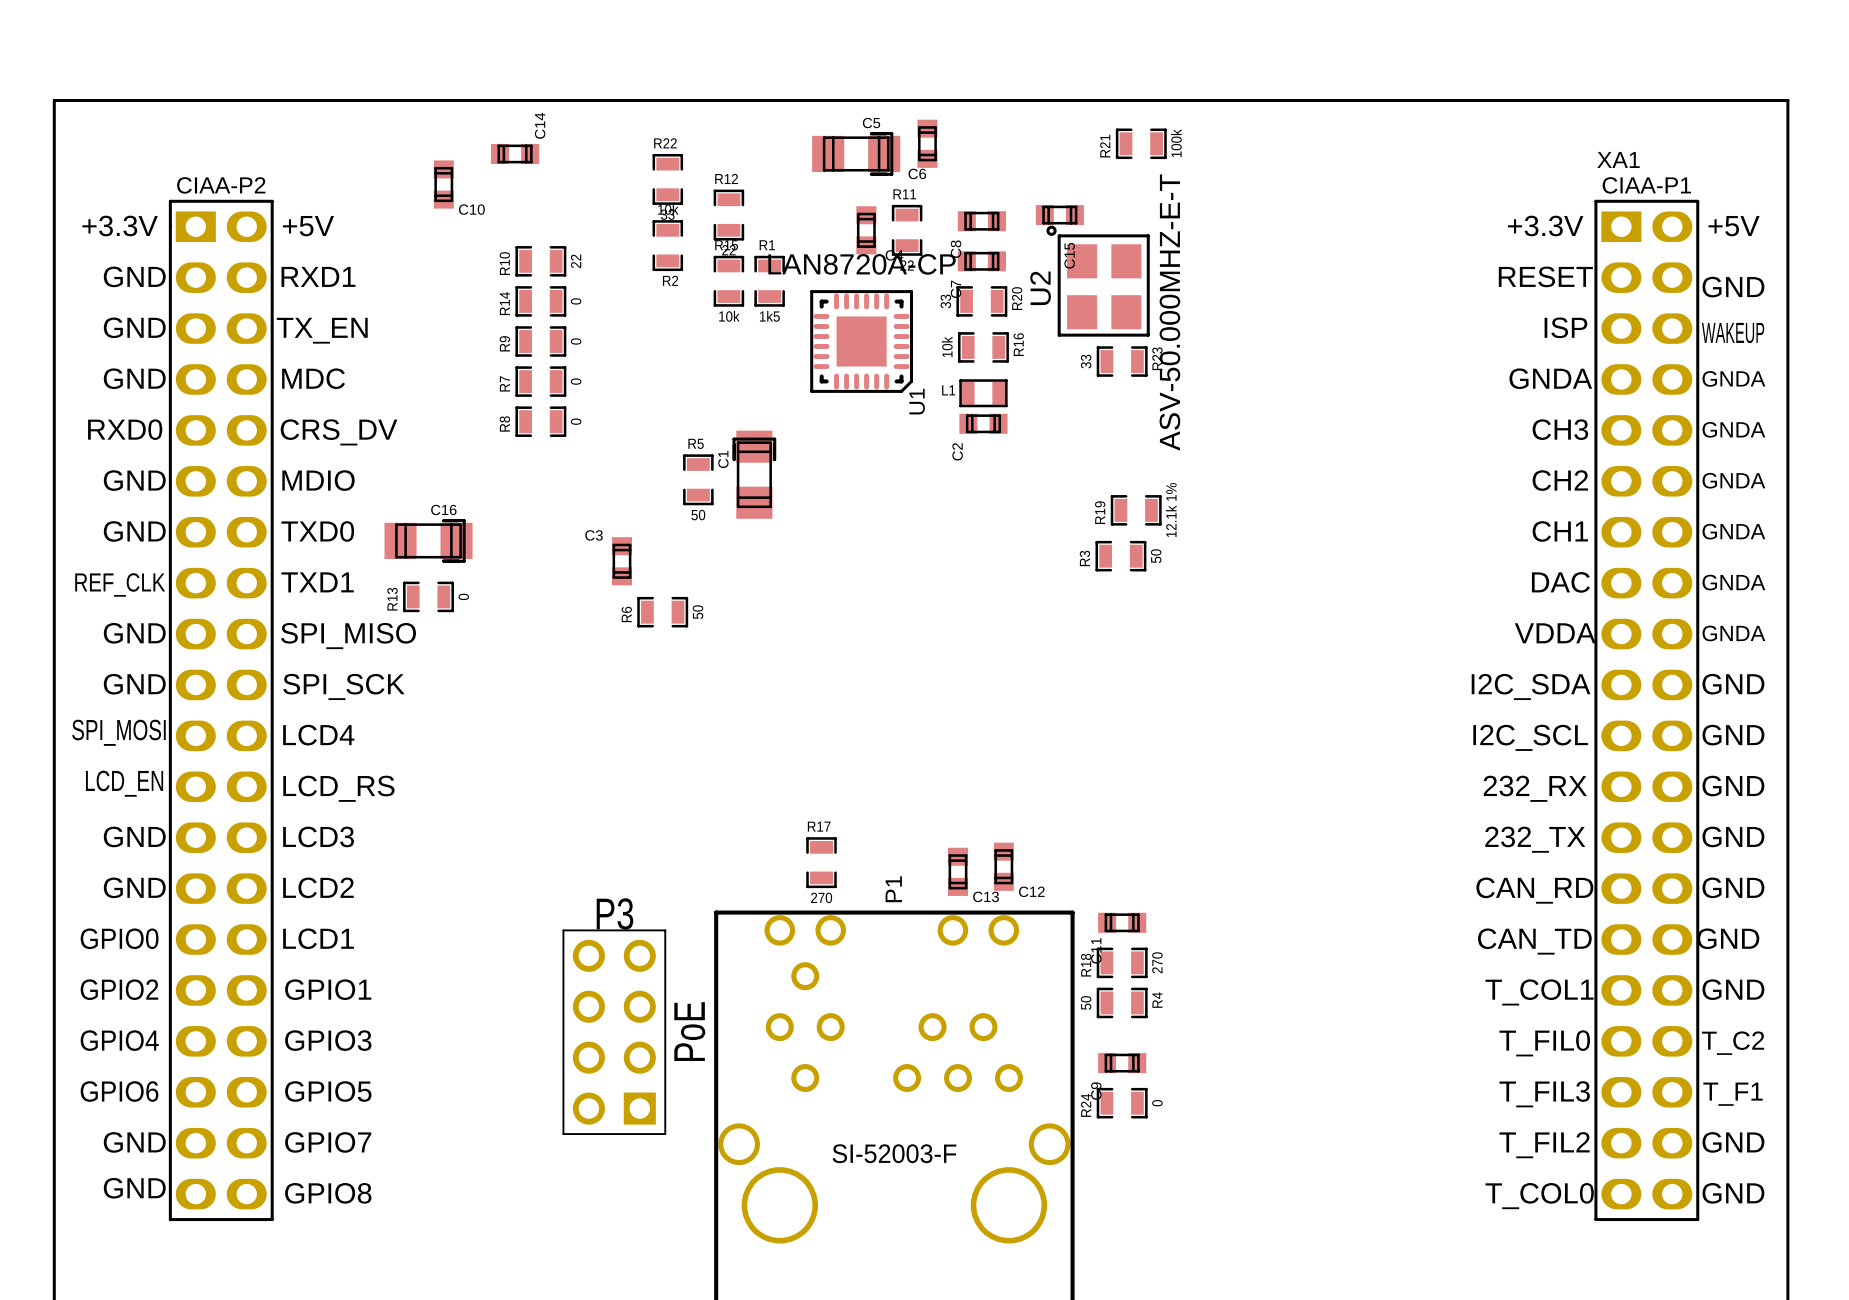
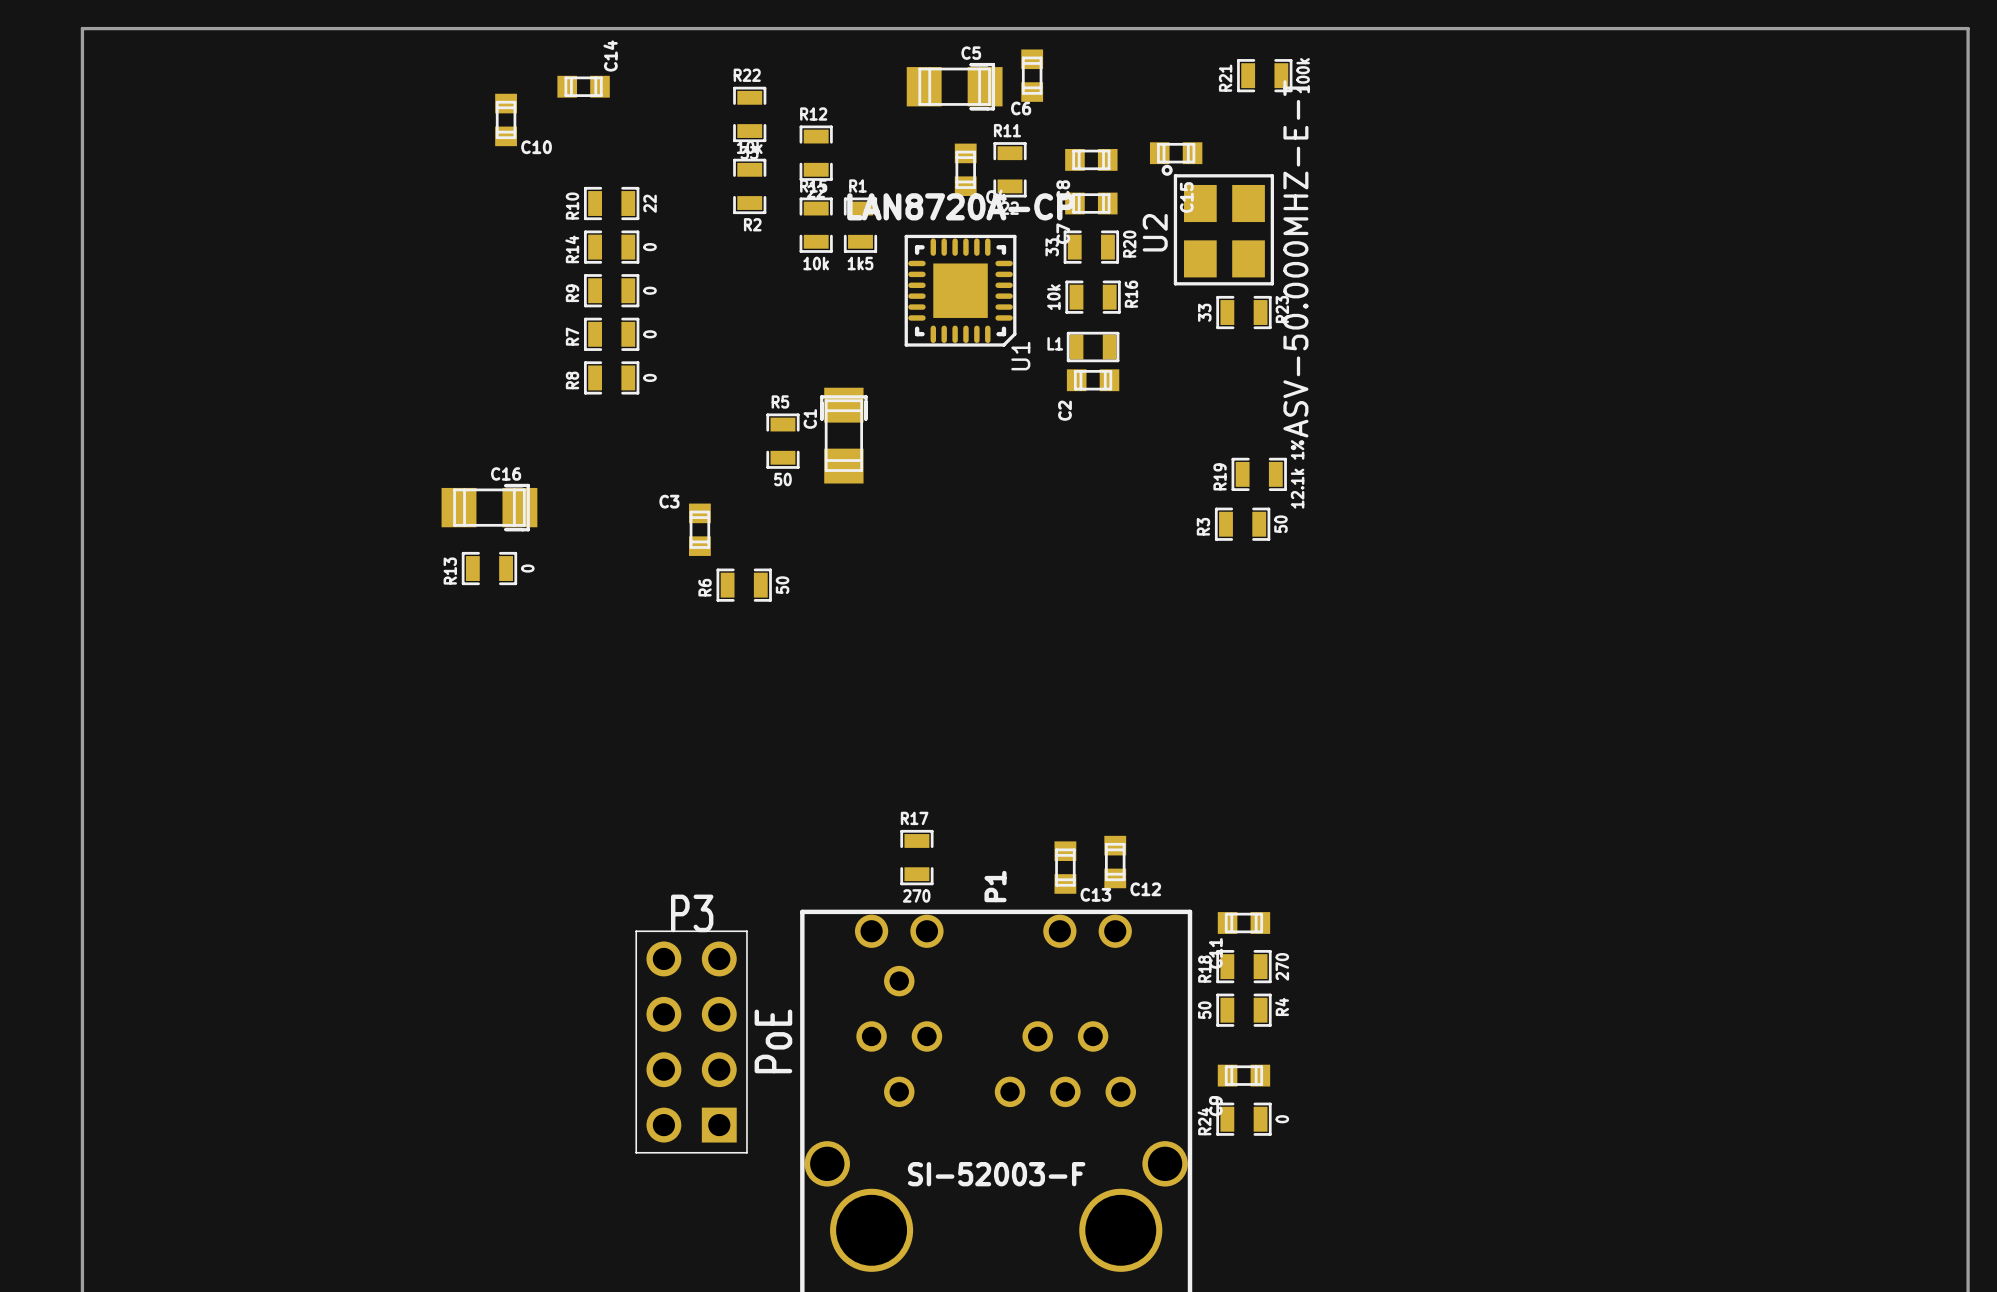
XA1: (934, 710) -> none

